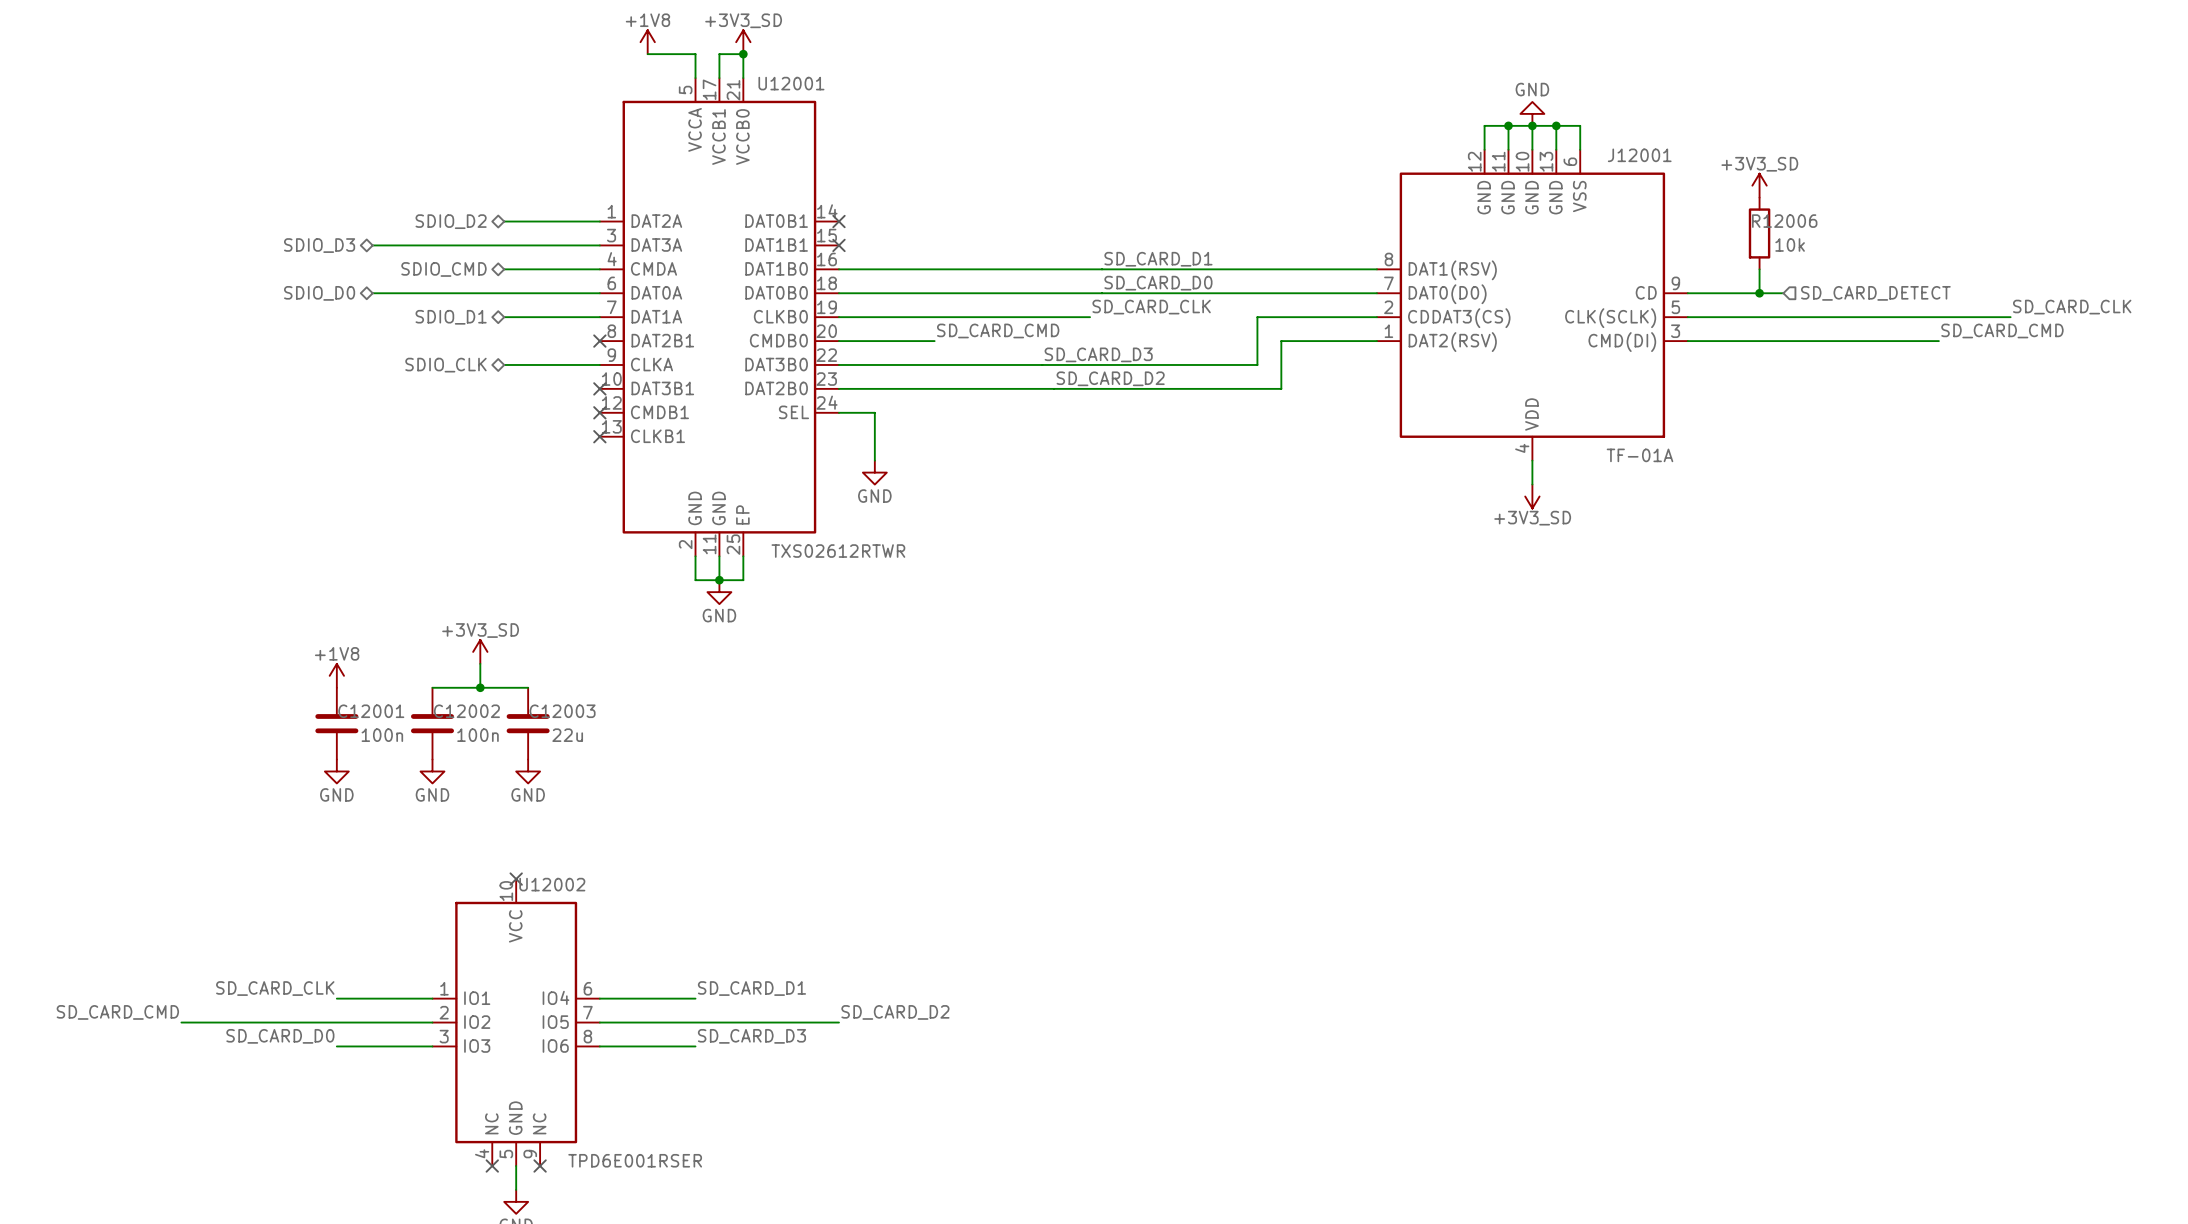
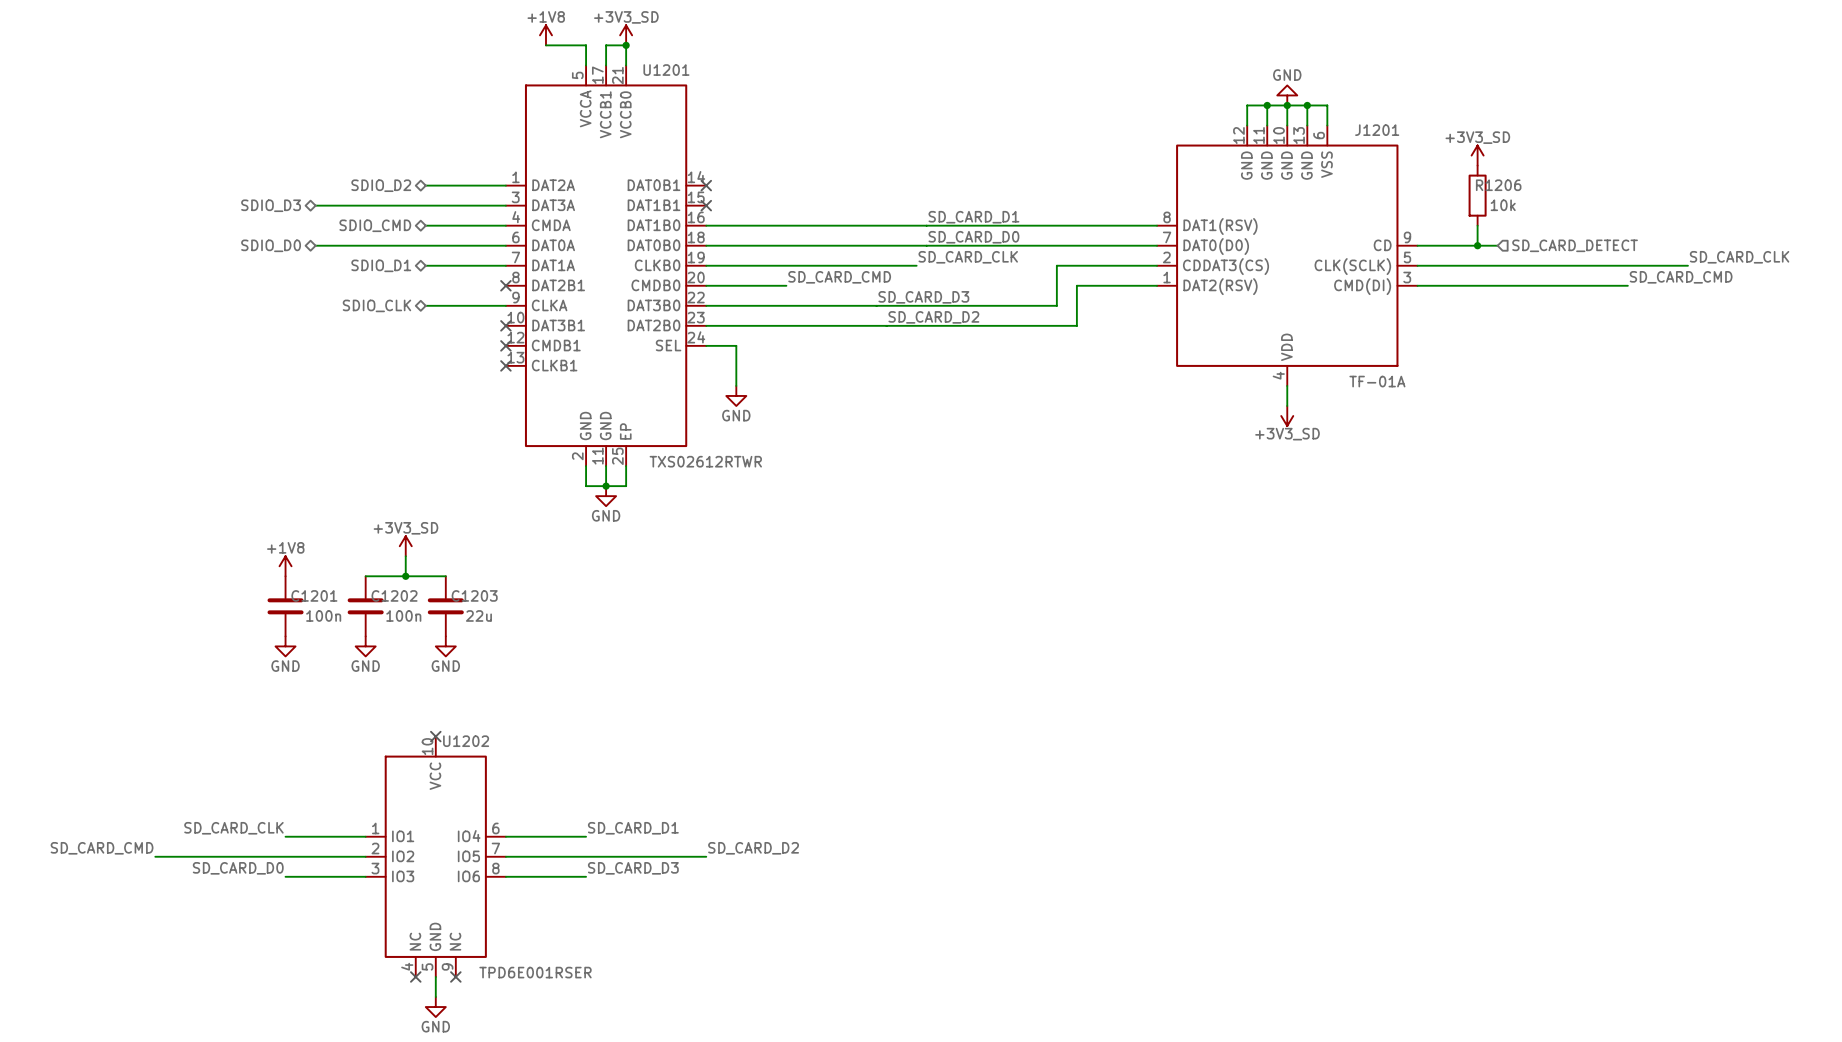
U12001 name: U12001 (791, 83) -> U1201 (666, 70)
J12001 name: J12001 (1639, 155) -> J1201 (1377, 130)
R12006 name: R12006 (1784, 221) -> R1206 (1498, 185)
C12001 name: C12001 (371, 711) -> C1201 (314, 595)
C12002 name: C12002 (466, 711) -> C1202 (394, 595)
C12003 name: C12003 (562, 711) -> C1203 (474, 595)
U12002 name: U12002 (552, 884) -> U1202 (466, 741)

